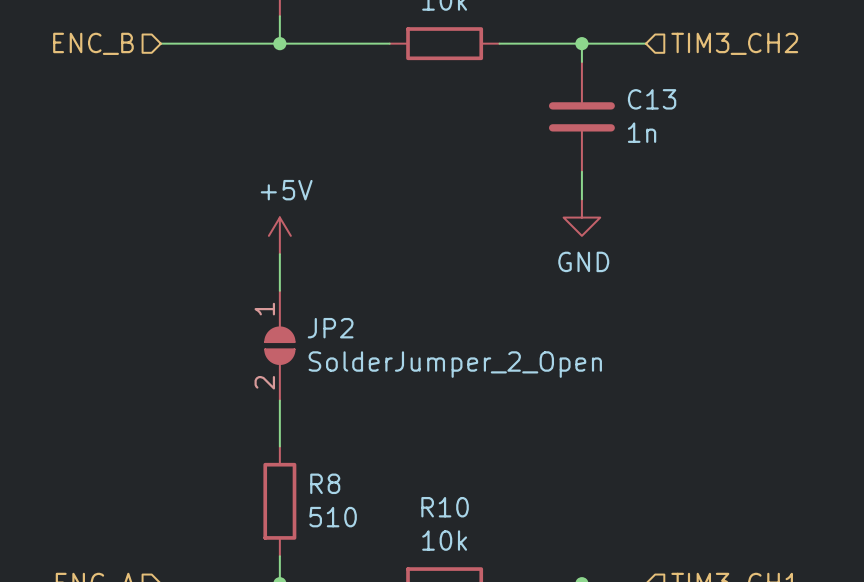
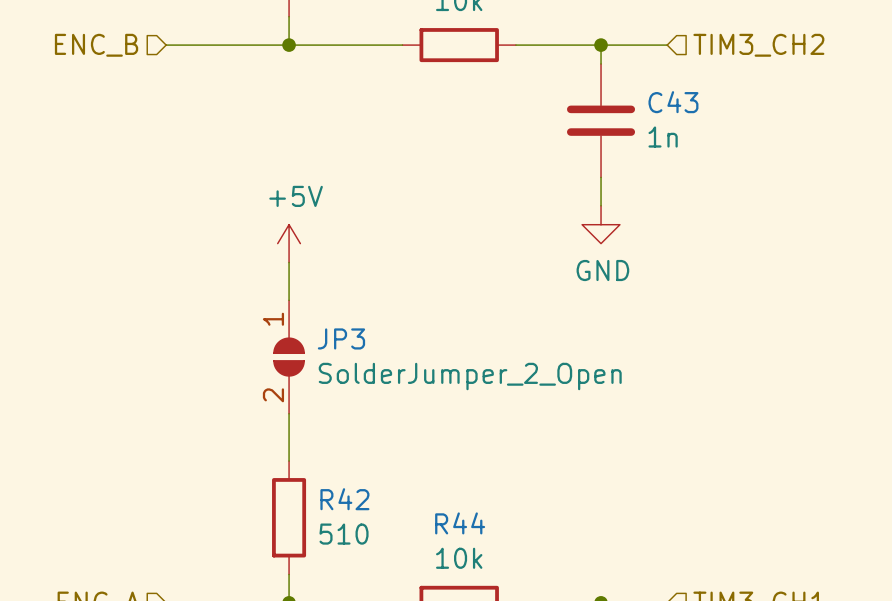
C13 name: C13 (652, 99) -> C43 (673, 102)
JP2 name: JP2 (330, 328) -> JP3 (341, 338)
R8 name: R8 (325, 483) -> R42 (344, 499)
R10 name: R10 (445, 507) -> R44 (460, 523)

